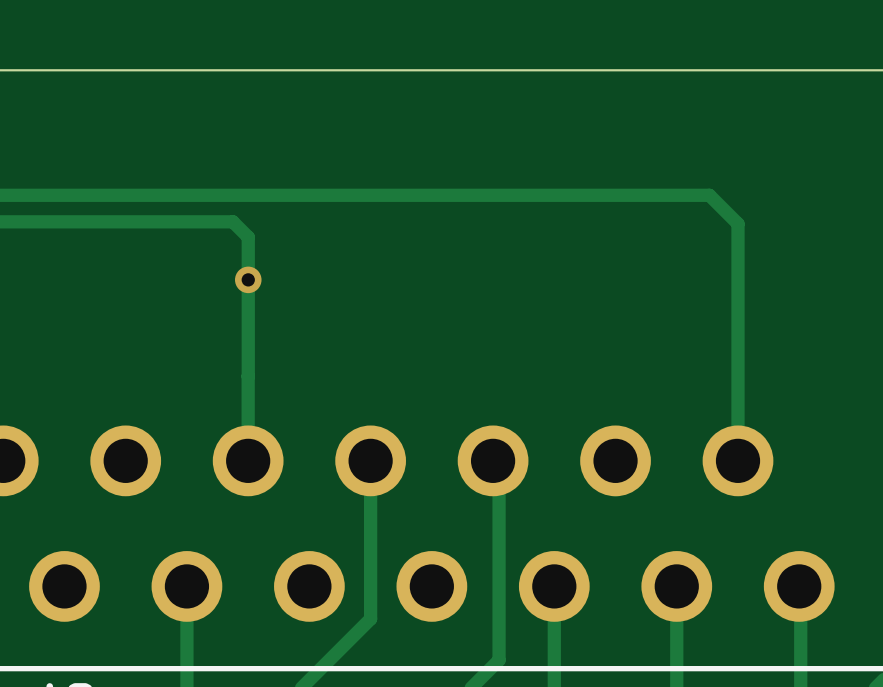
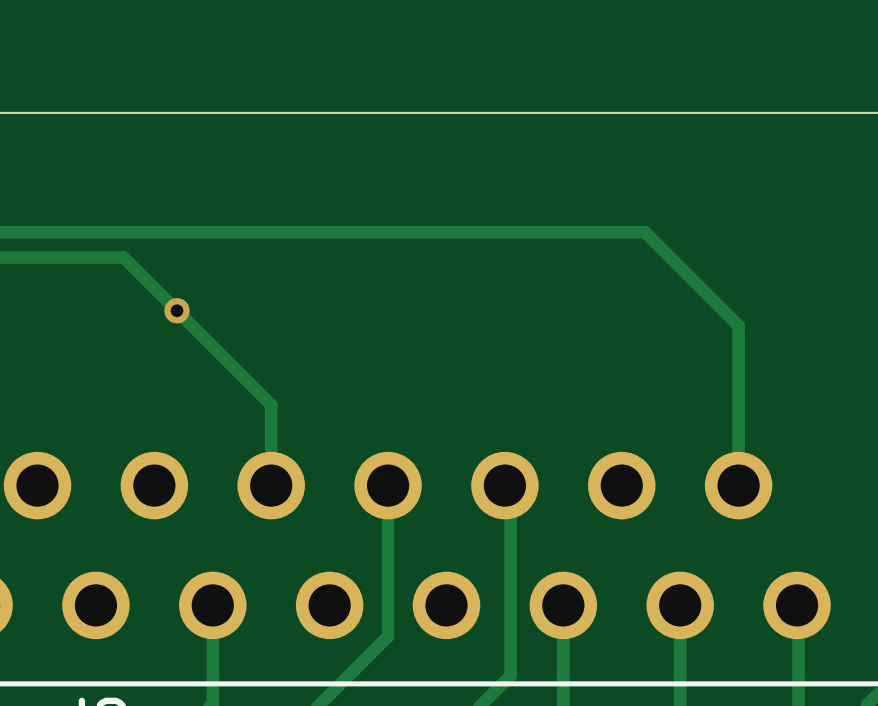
track: (639, 195) (709, 195) (738, 223) (738, 293) -> (644, 232) (738, 325)
track: (93, 221) (232, 221) (248, 237) (248, 376) -> (123, 257) (271, 404)
via position: (248, 279) -> (177, 310)

